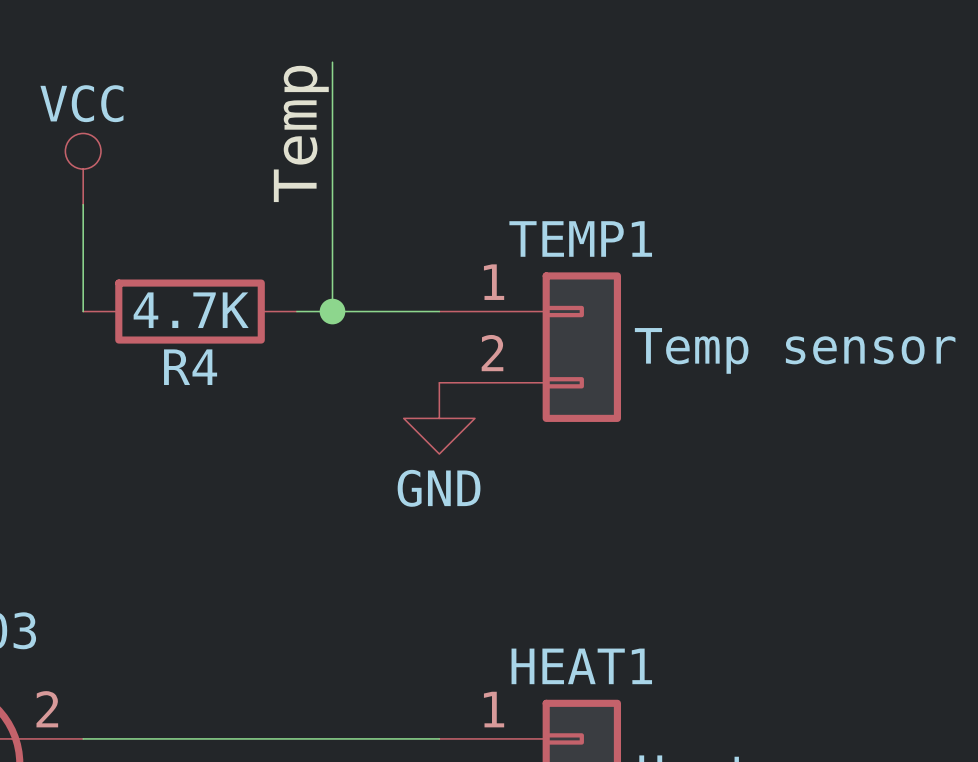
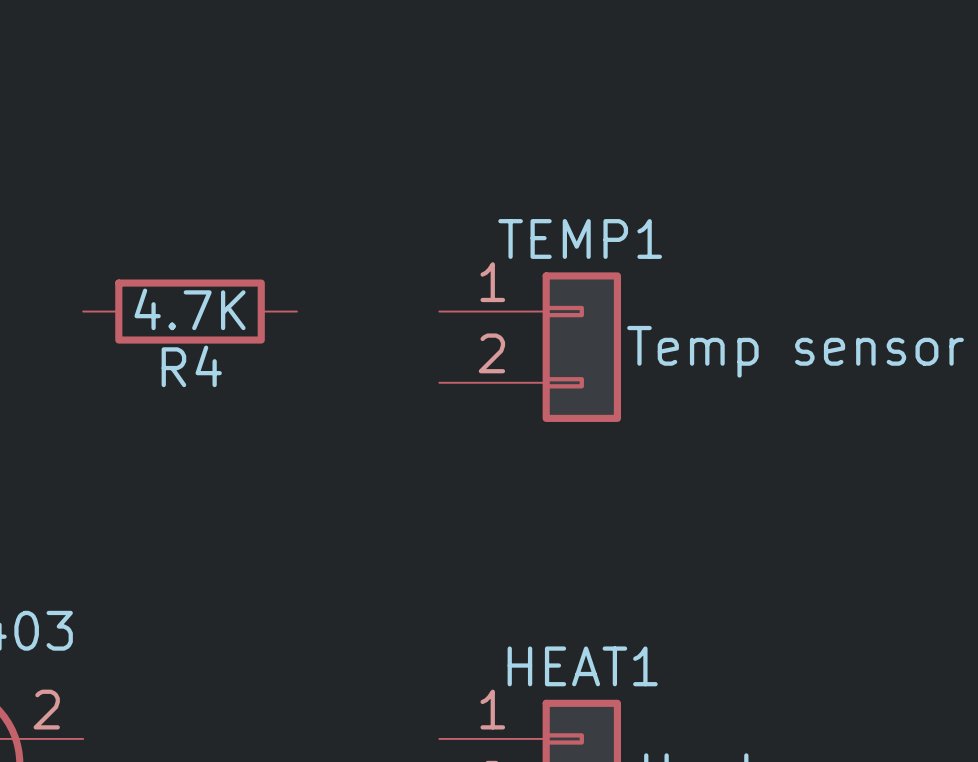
wire: (332, 62) (332, 311) -> none
label: Temp (301, 133) -> none
power symbol: VCC (83, 169) -> none
wire: (83, 204) (83, 311) -> none
wire: (296, 311) (439, 311) -> none
junction: (332, 311) -> none
power symbol: GND (439, 418) -> none
wire: (83, 738) (439, 738) -> none

